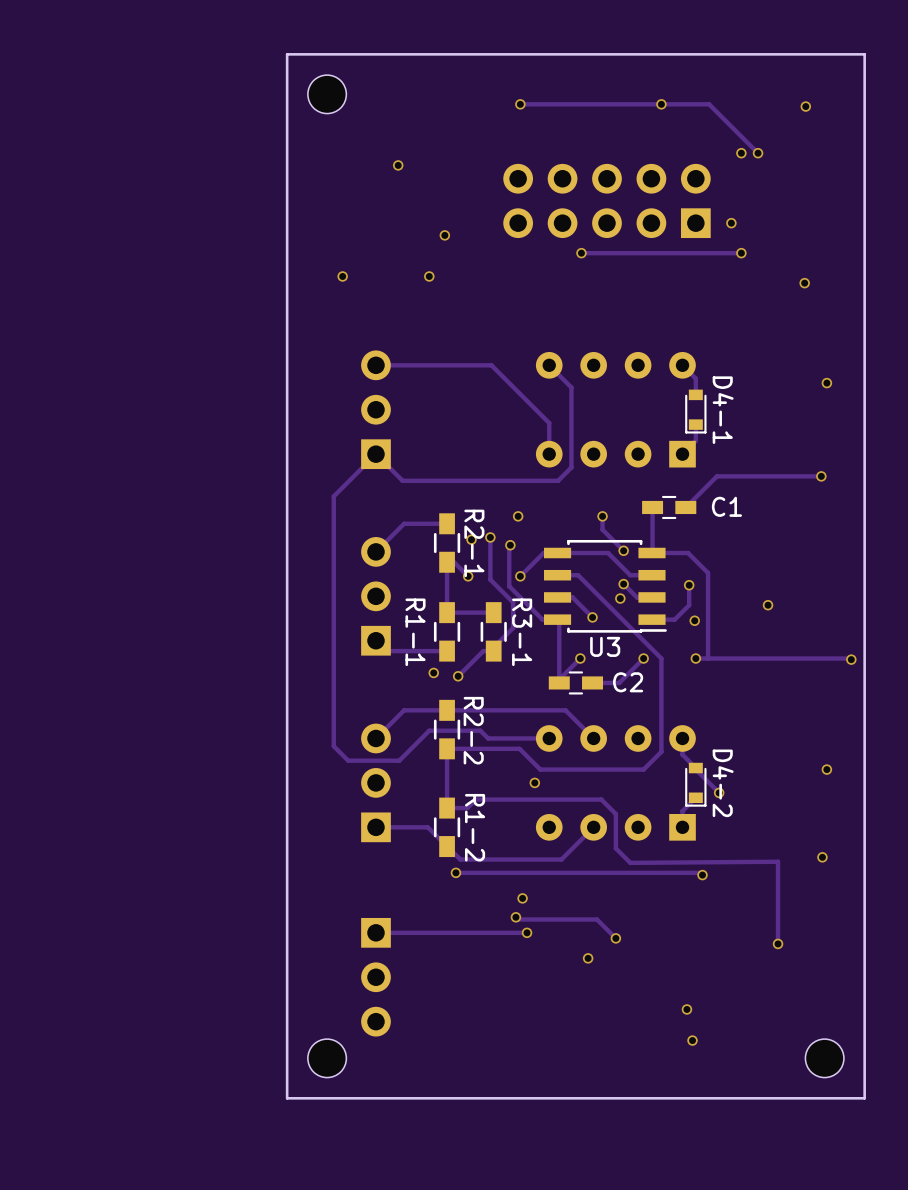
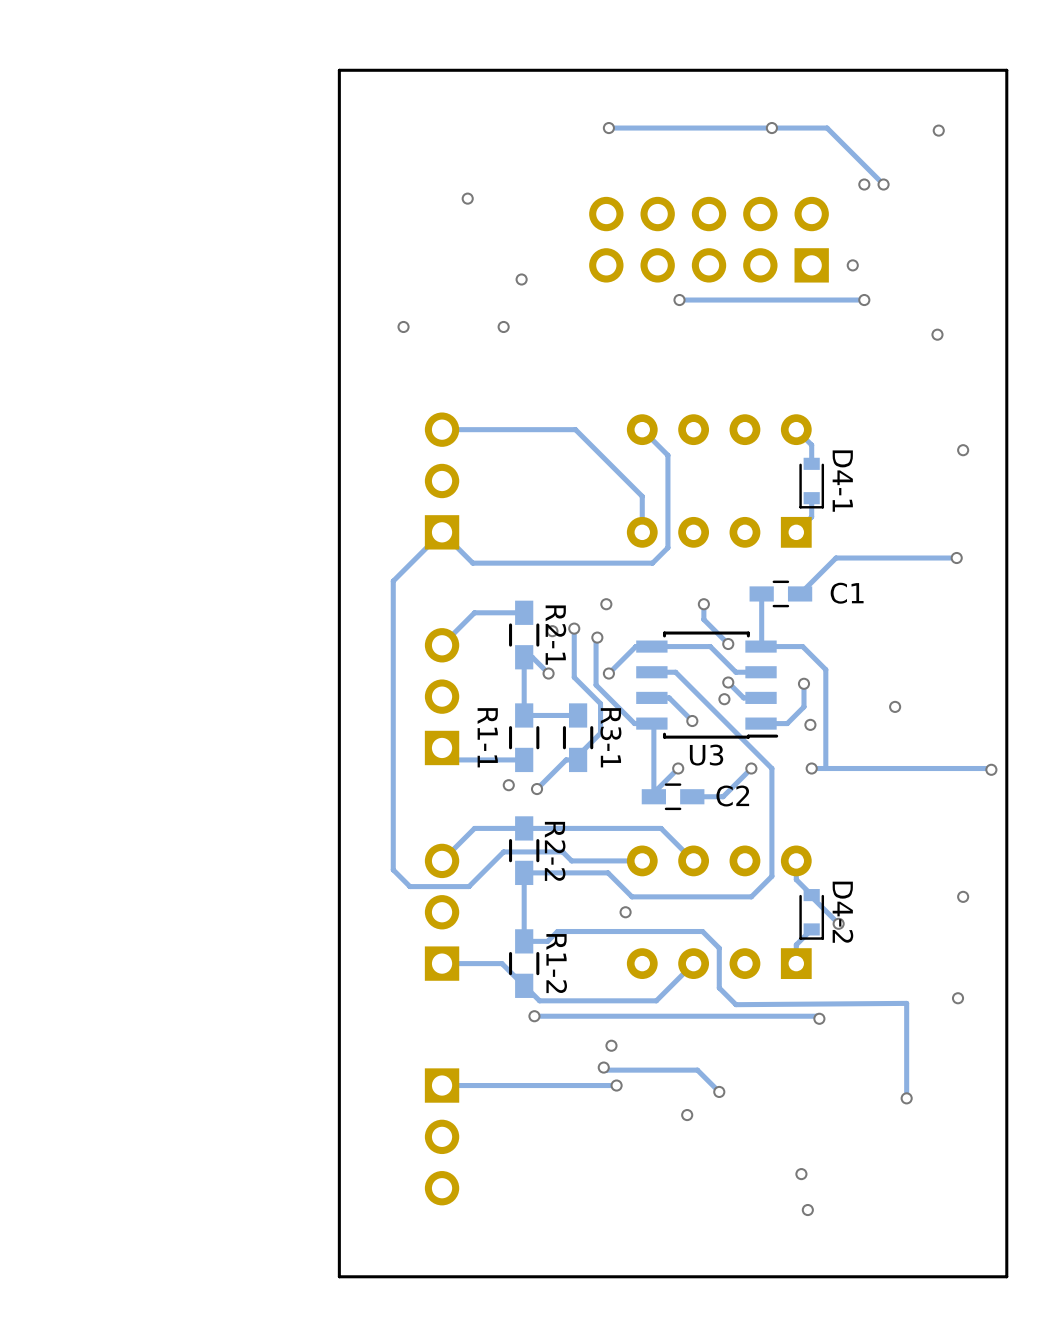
part: (327, 94) -> none
part: (327, 1058) -> none
part: (824, 1058) -> none

